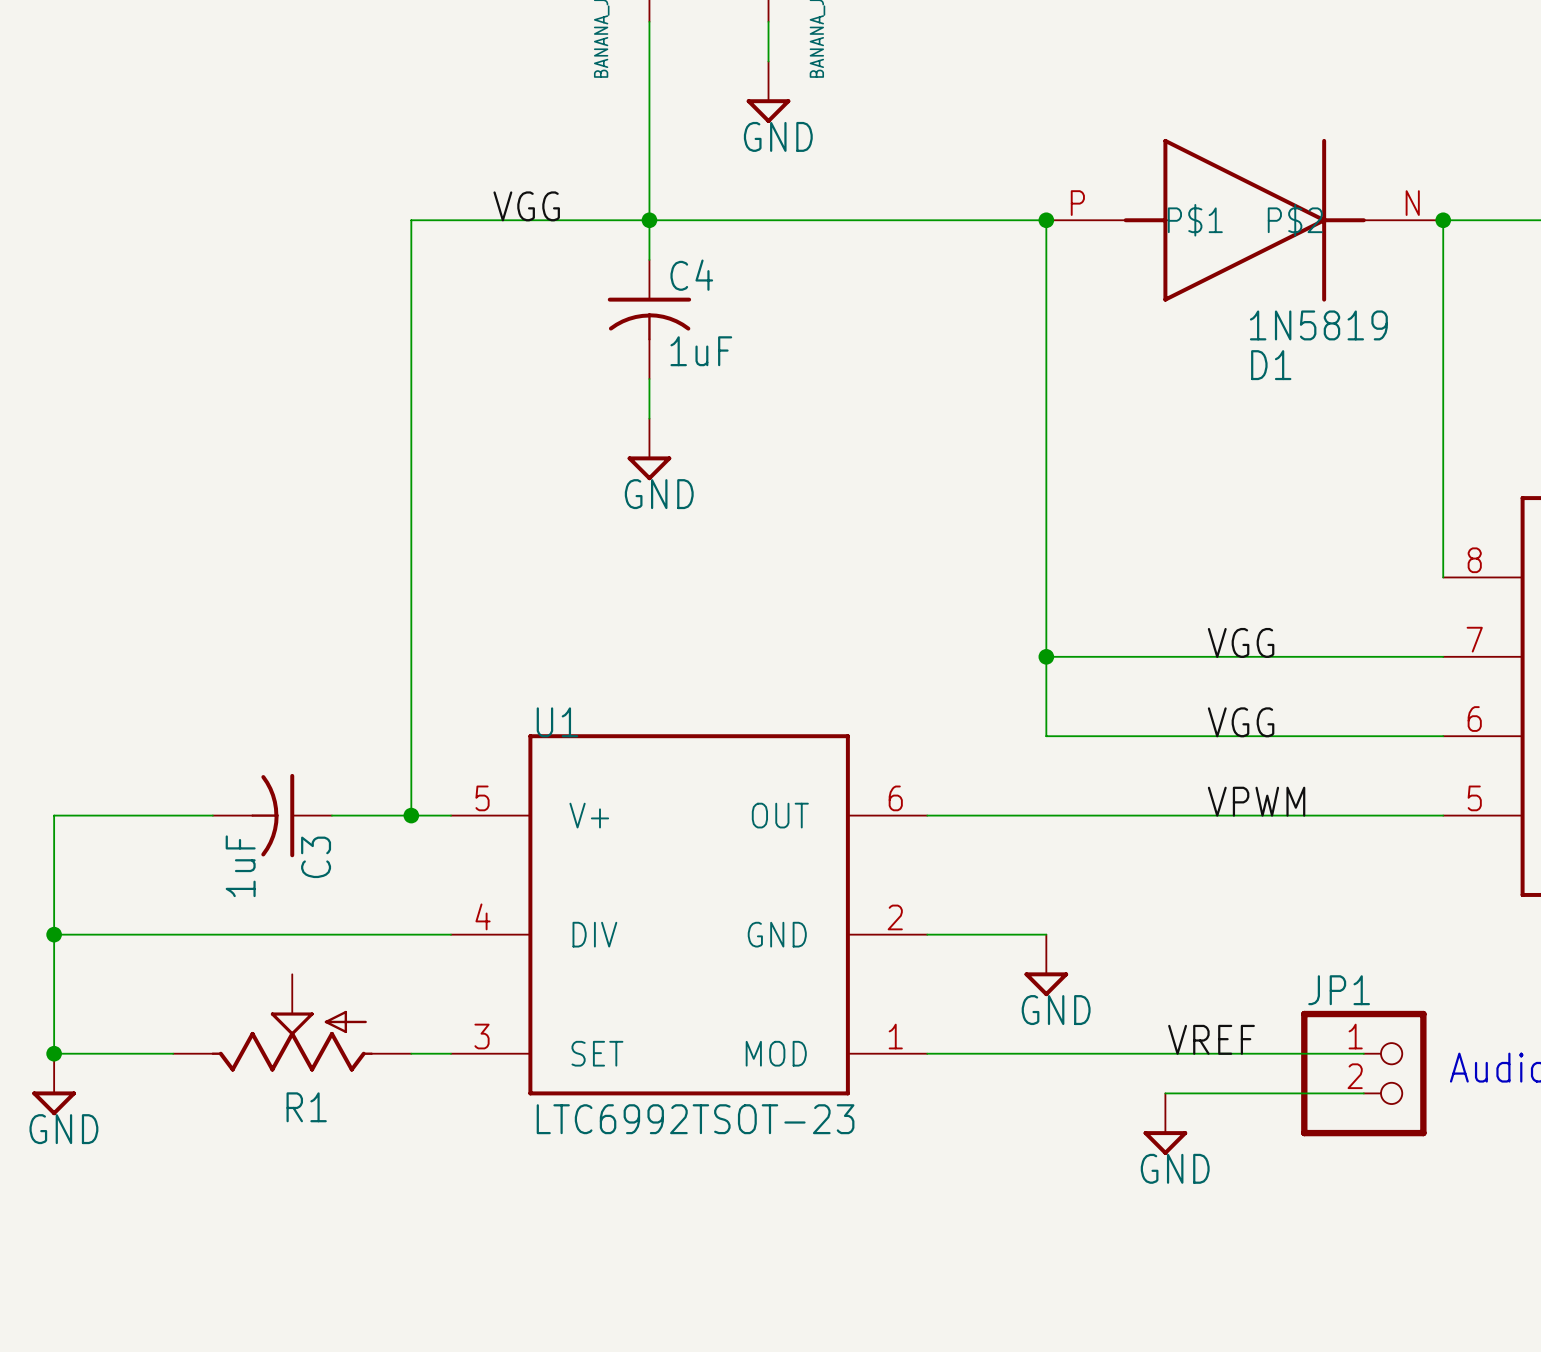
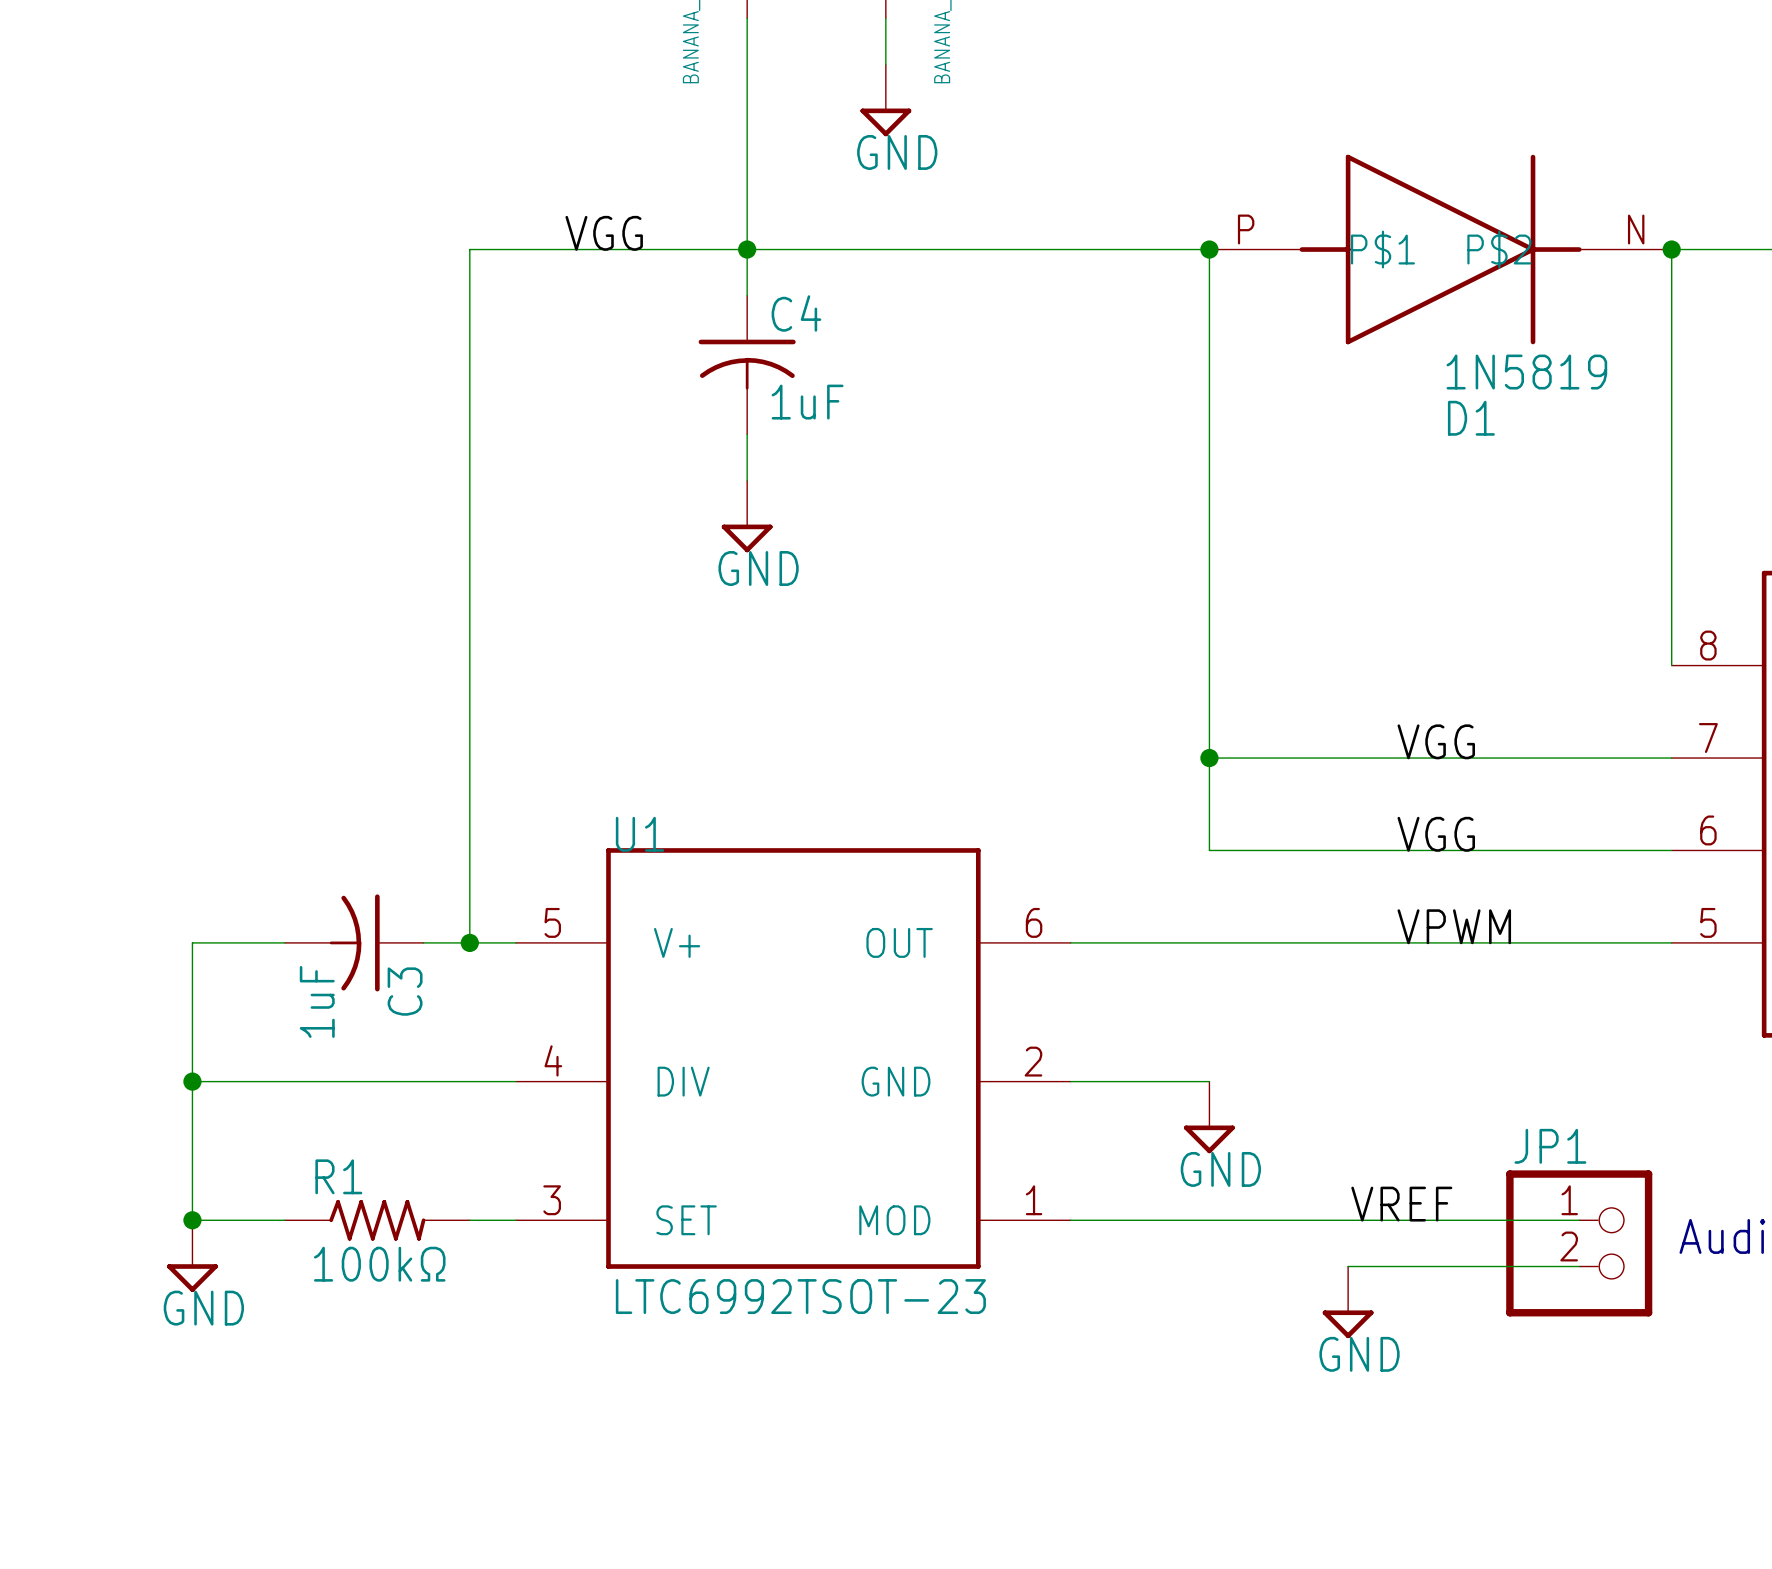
wire: (173, 815) (54, 815) (54, 1053) (173, 1053) -> (192, 942) (192, 1220) (284, 1220)
C3 position: (272, 815) -> (354, 942)
wire: (54, 934) (173, 934) -> none
junction: (54, 934) -> none
junction: none -> (192, 1081)
R1 symbol: [173, 974, 412, 1072] -> [284, 1199, 470, 1241]
junction: (54, 1053) -> none
junction: none -> (192, 1220)
power symbol position: GND (54, 1084) -> GND (192, 1256)
R1 value: none -> 100kΩ (379, 1264)
R1 name position: R1 (306, 1107) -> R1 (338, 1176)

